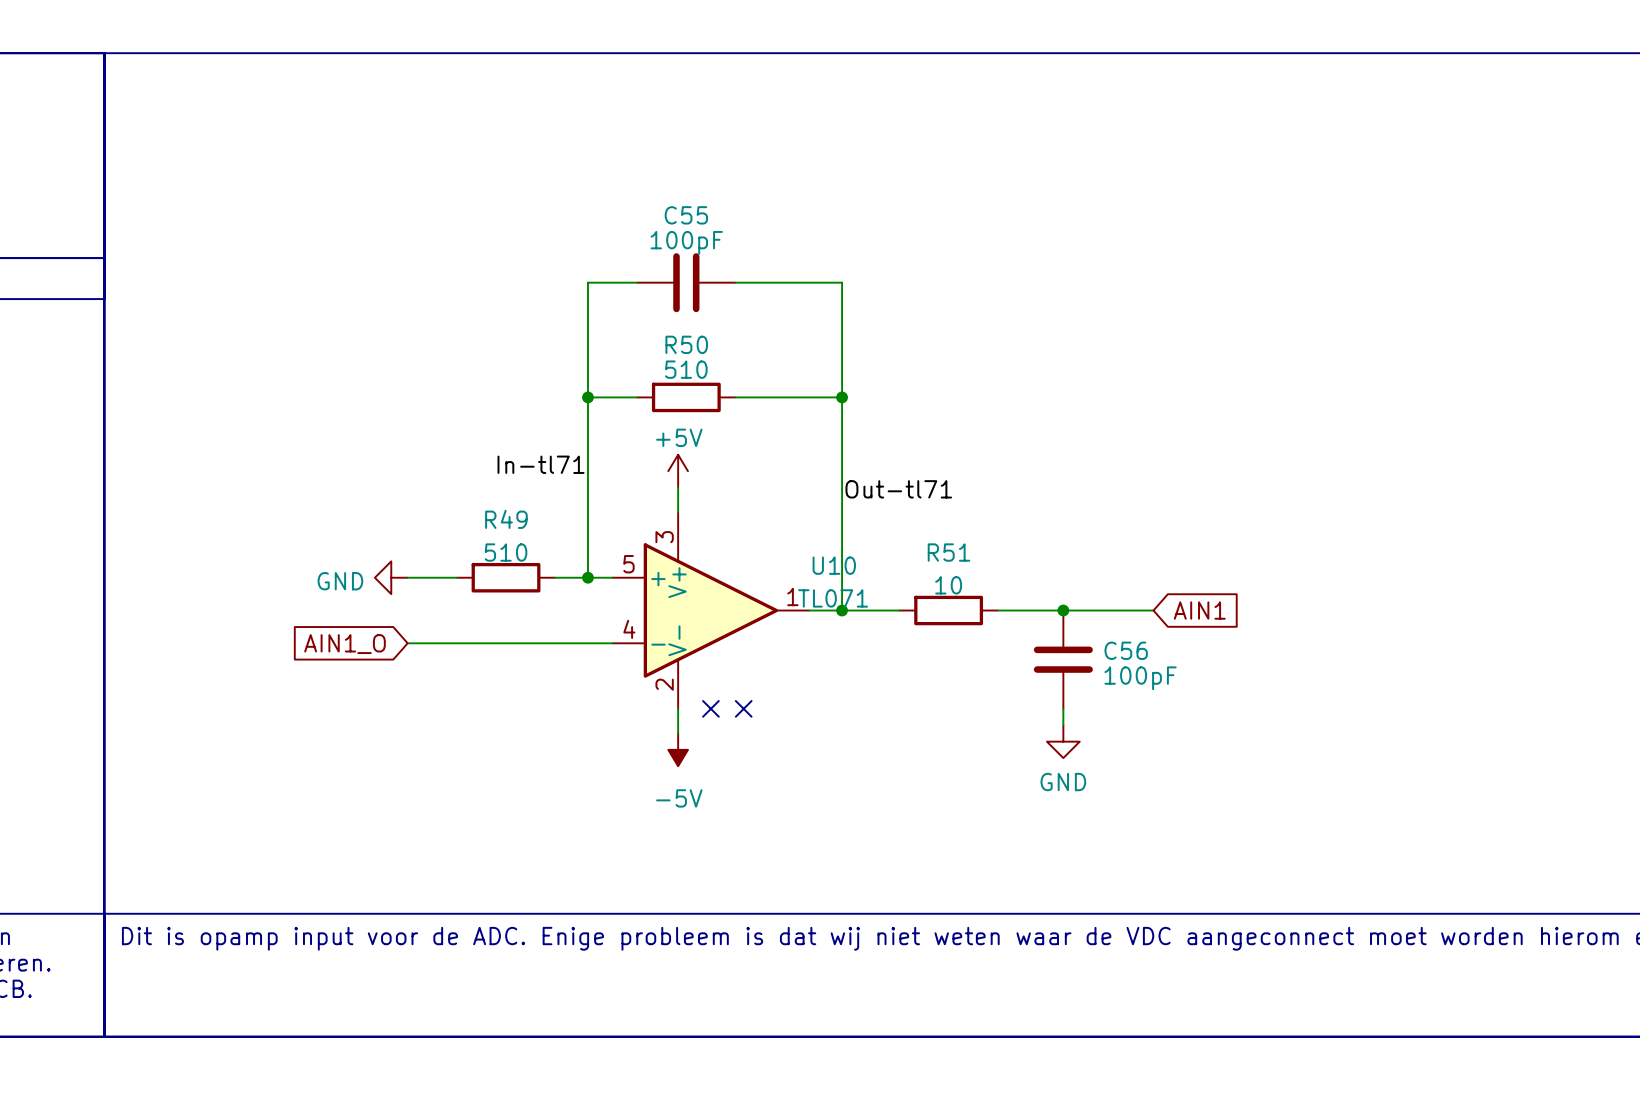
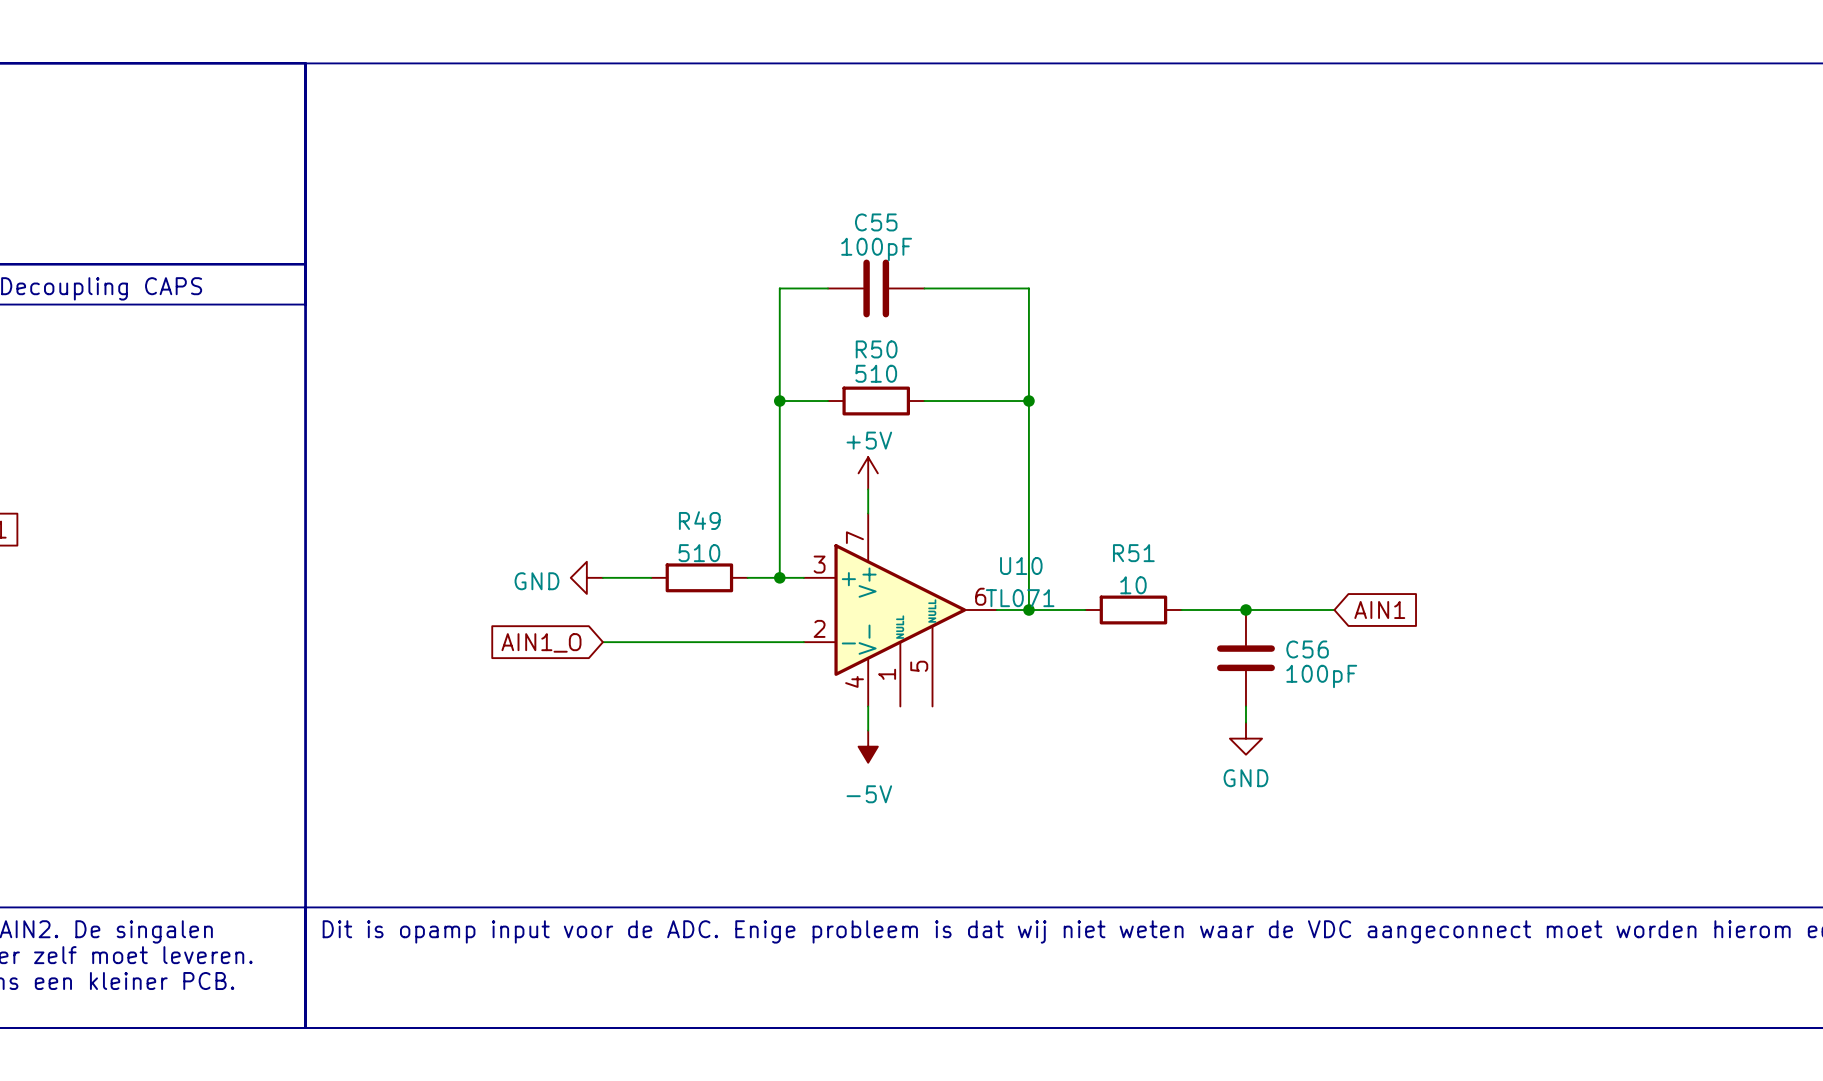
label: In-tl71 (541, 464) -> none
label: Out-tl71 (898, 489) -> none
U10 symbol: [612, 512, 810, 709] -> [803, 513, 997, 707]
no-connect mark: (710, 708) -> none
no-connect mark: (743, 708) -> none

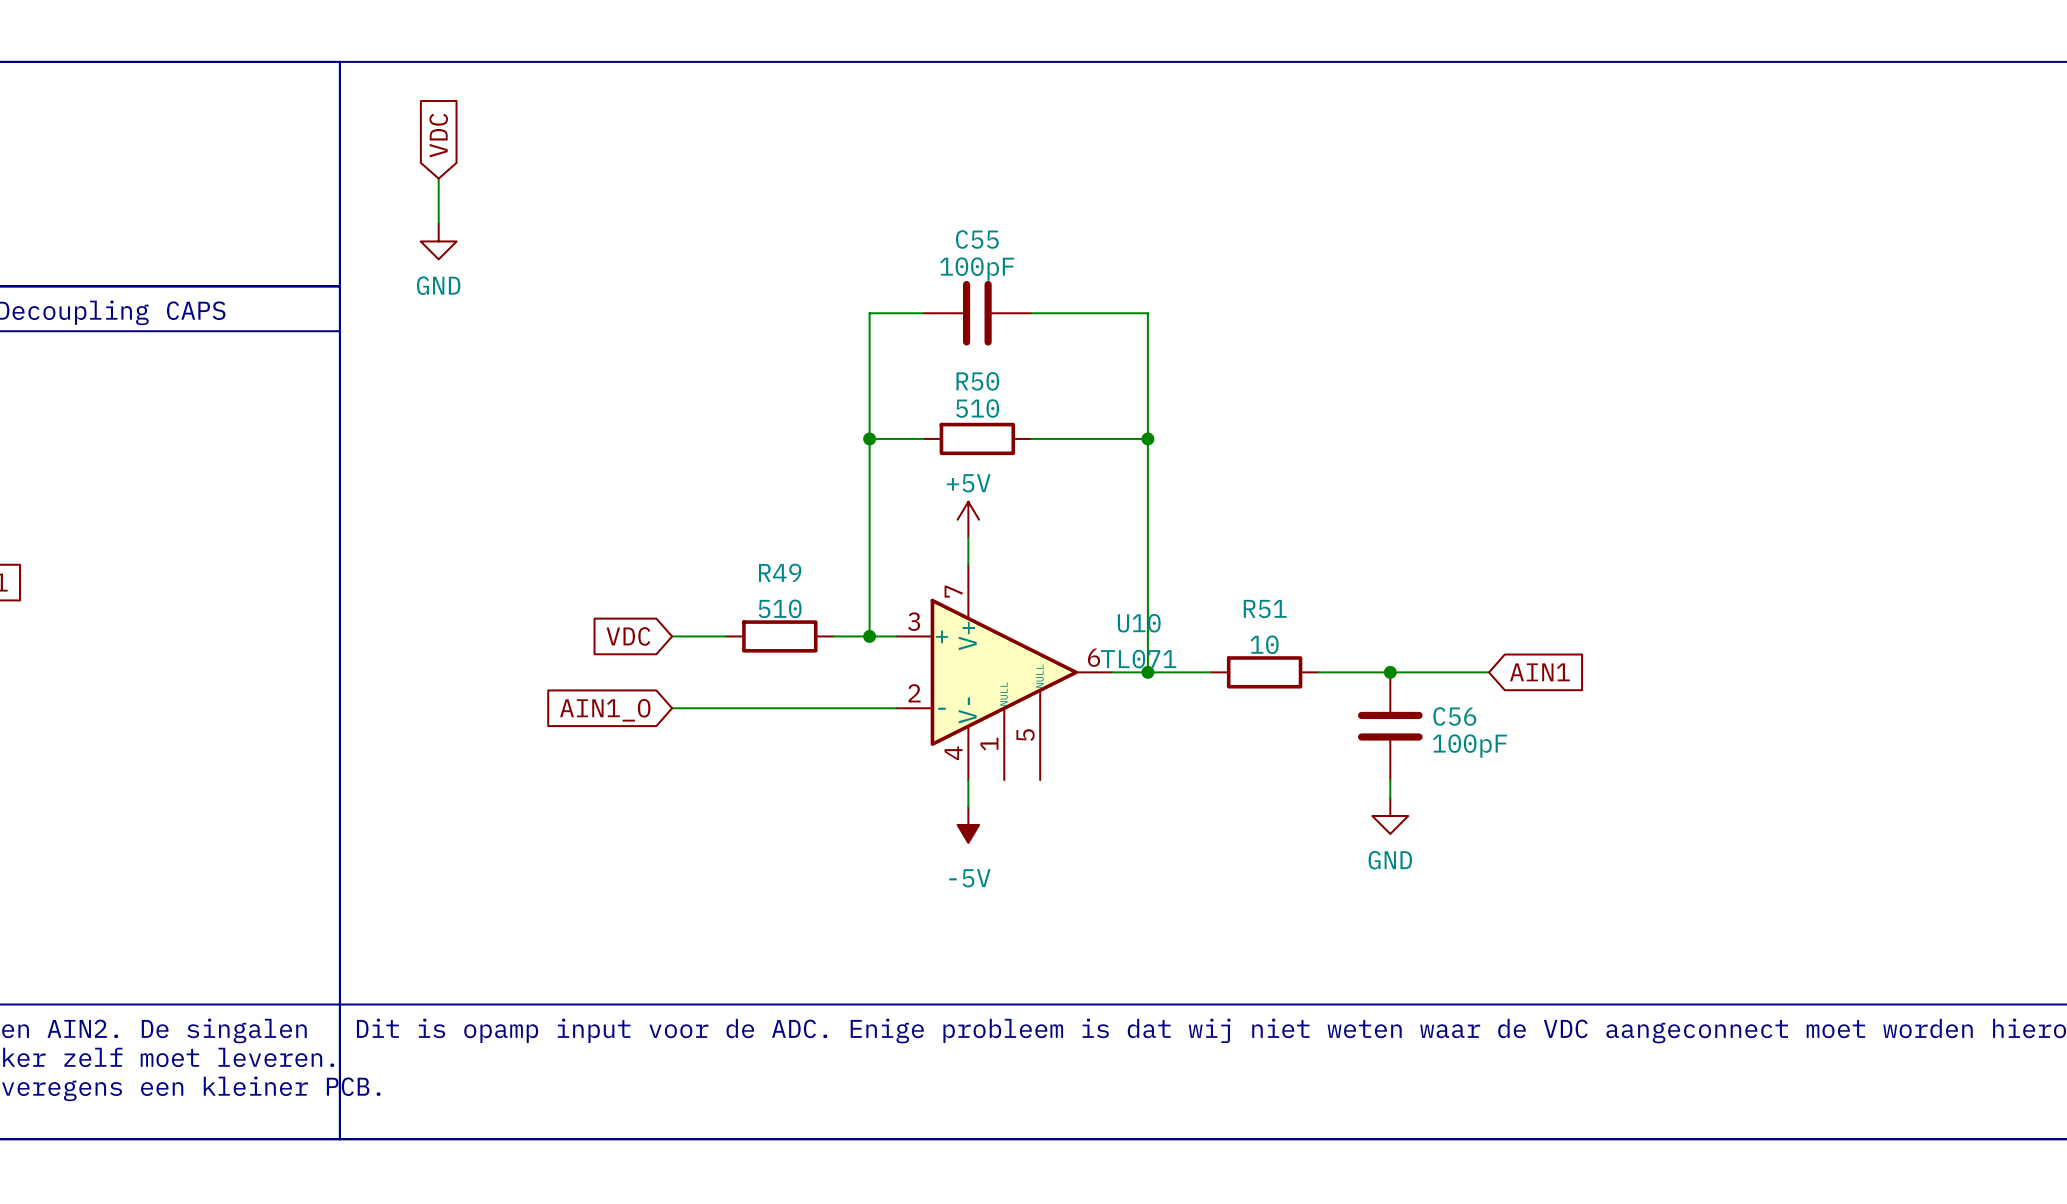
global label: none -> VDC (438, 135)
wire: none -> (438, 178) (438, 223)
power symbol: none -> GND (438, 241)
global label: none -> VDC (628, 636)
power symbol: GND (586, 577) -> none

